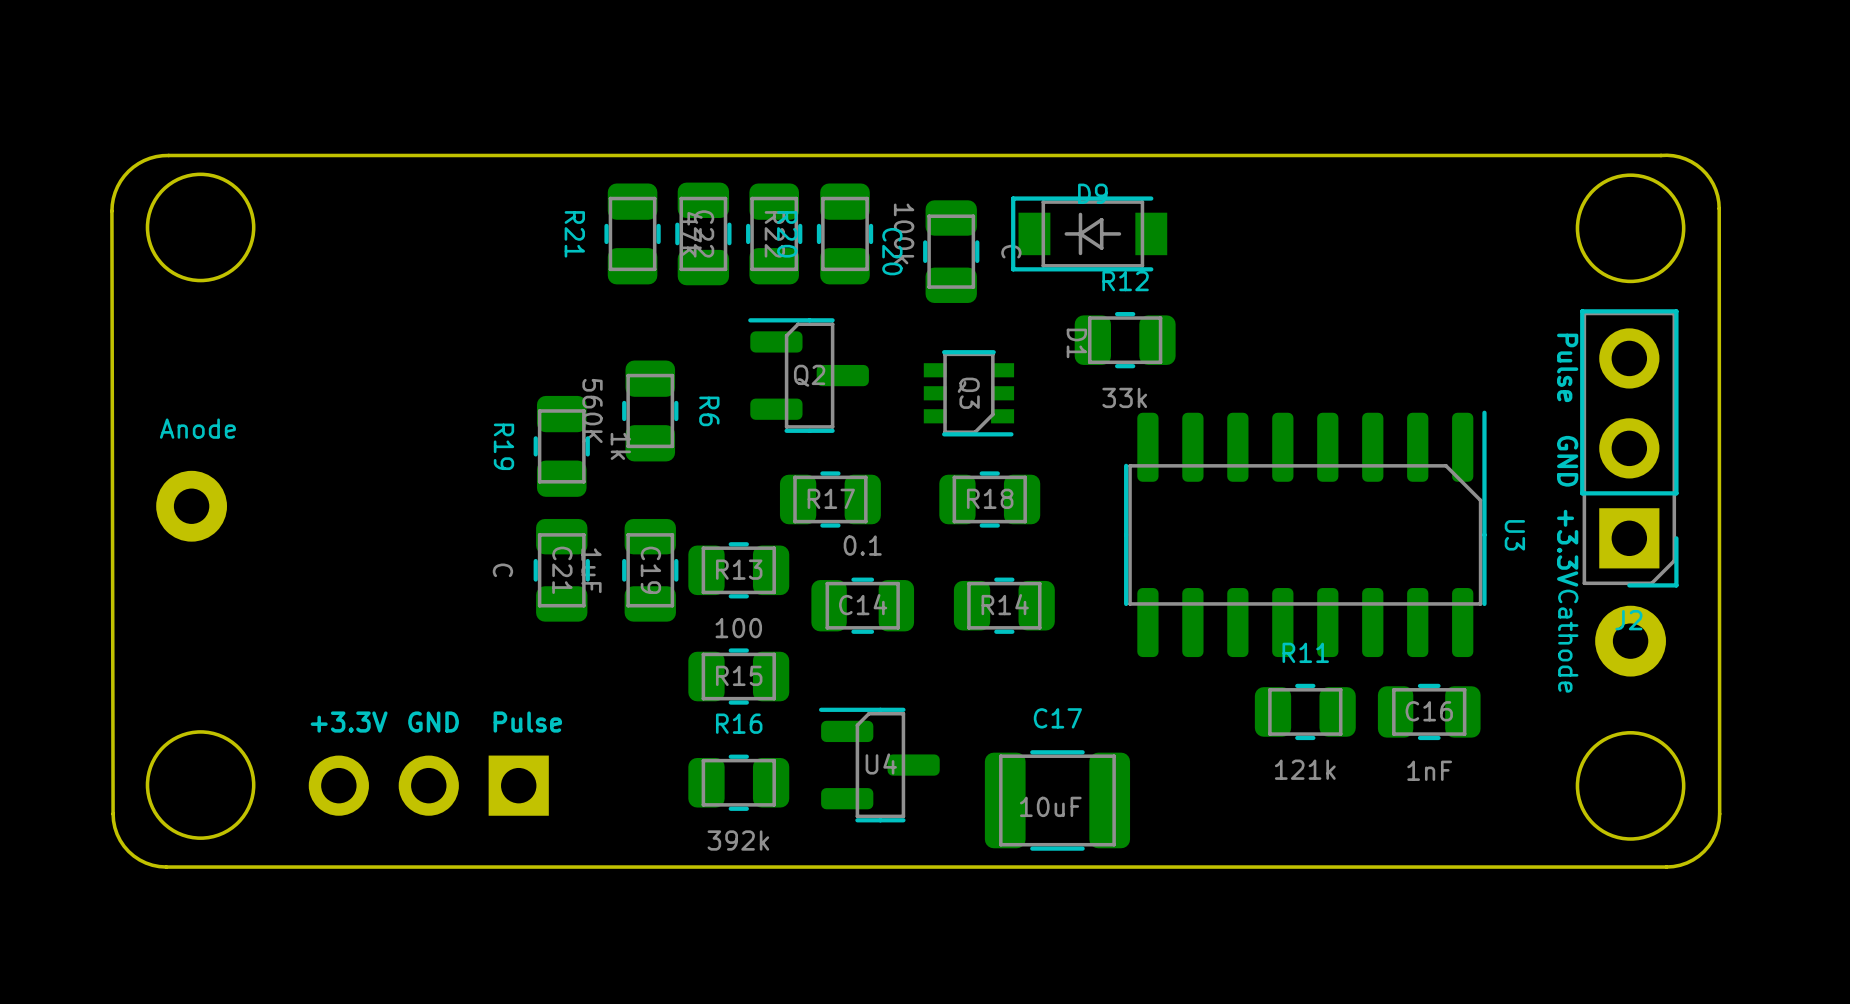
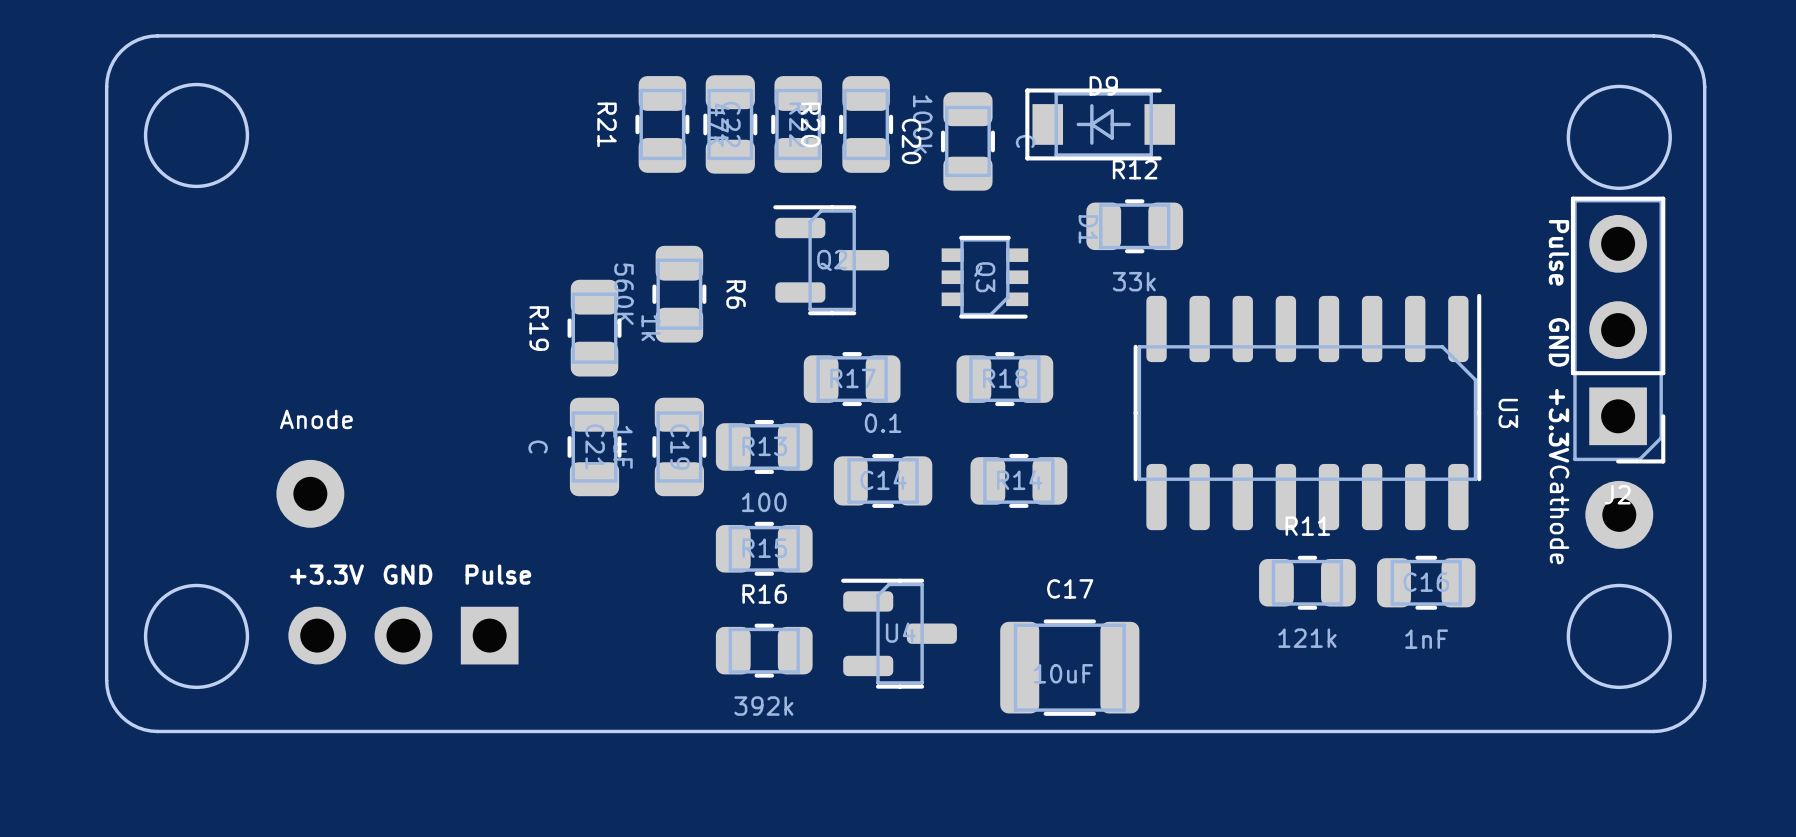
board edge: (1660, 155) (1679, 157) (1691, 161) (1701, 169) (1713, 184) (1718, 202) (1719, 813) -> none
board edge: (1661, 155) (168, 155) (144, 160) (128, 171) (120, 181) (113, 198) (111, 211) (113, 813) (117, 834) (128, 851) (145, 863) (166, 867) -> (1704, 680) (1704, 86) (1700, 67) (1694, 55) (1684, 46) (1673, 39) (1653, 35) (150, 36) (138, 39) (121, 50) (110, 67) (107, 80) (107, 687) (110, 700) (117, 711) (126, 720) (138, 727) (157, 731) (215, 731)
round board edge position: (200, 227) -> (196, 135)
round board edge position: (1630, 228) -> (1619, 137)
part position: (191, 506) -> (310, 493)
text position: +3.3V (349, 722) -> +3.3V (327, 574)
text position: GND (433, 722) -> GND (408, 574)
text position: Pulse (527, 722) -> Pulse (498, 574)
round board edge position: (200, 785) -> (196, 636)
part position: (428, 785) -> (403, 635)
round board edge position: (1630, 785) -> (1619, 636)

